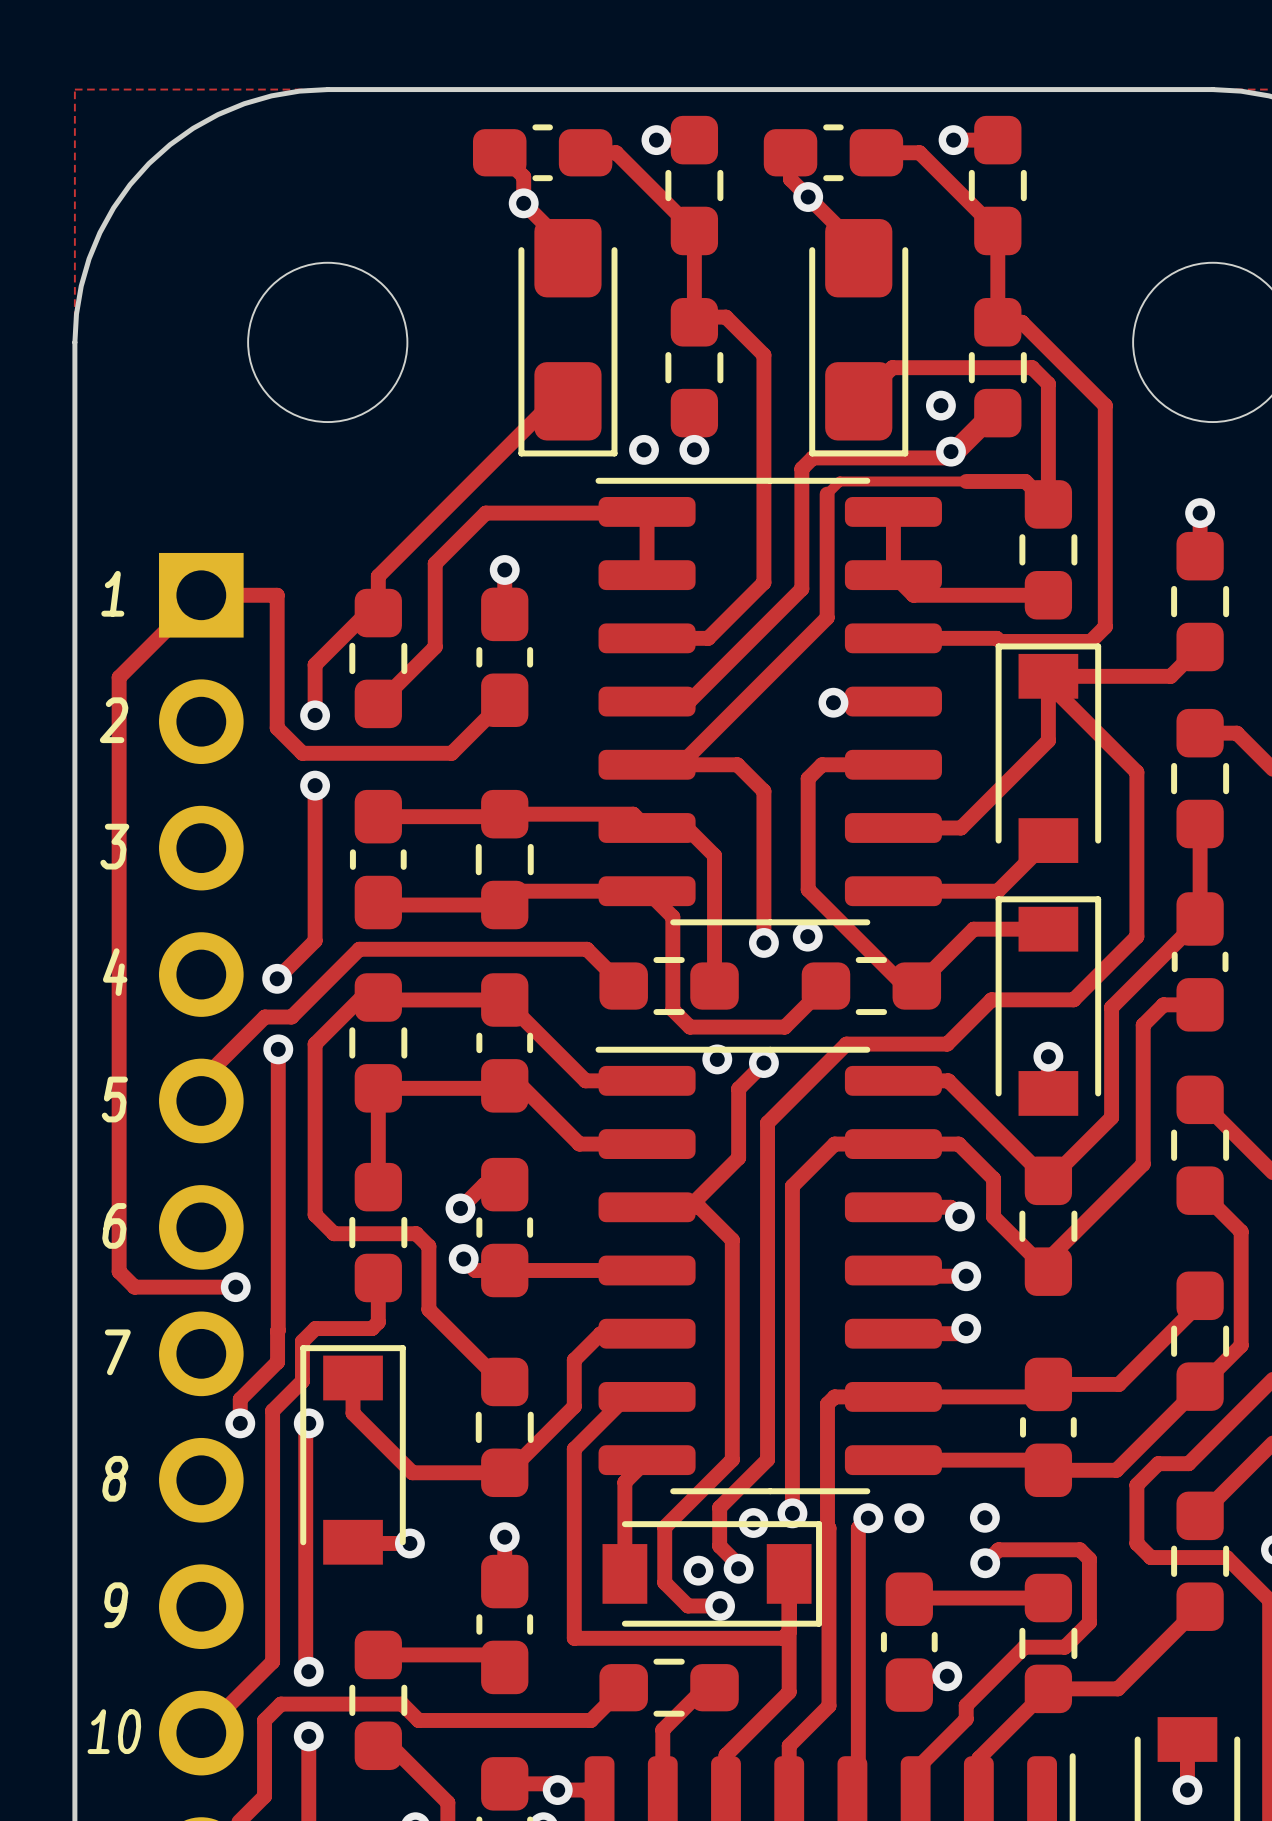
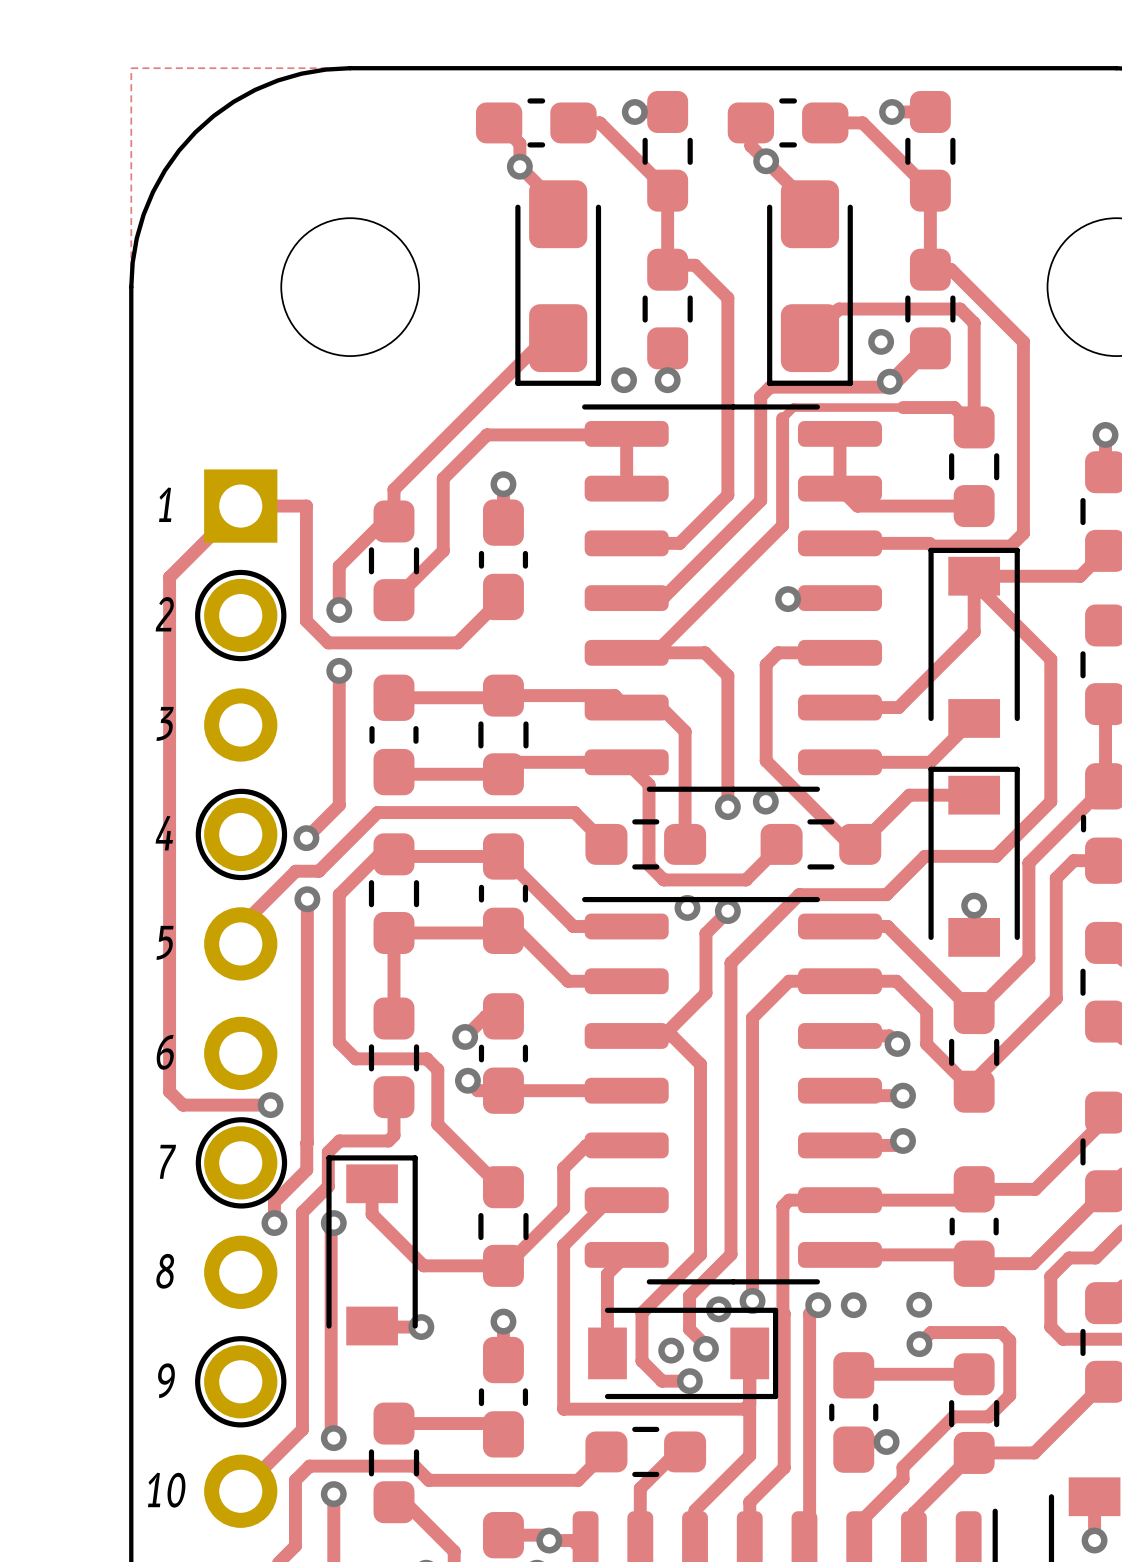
drawing: none -> [195, 569, 287, 662]
drawing: none -> [195, 788, 288, 881]
drawing: none -> [195, 1117, 288, 1209]
drawing: none -> [195, 1336, 287, 1428]

